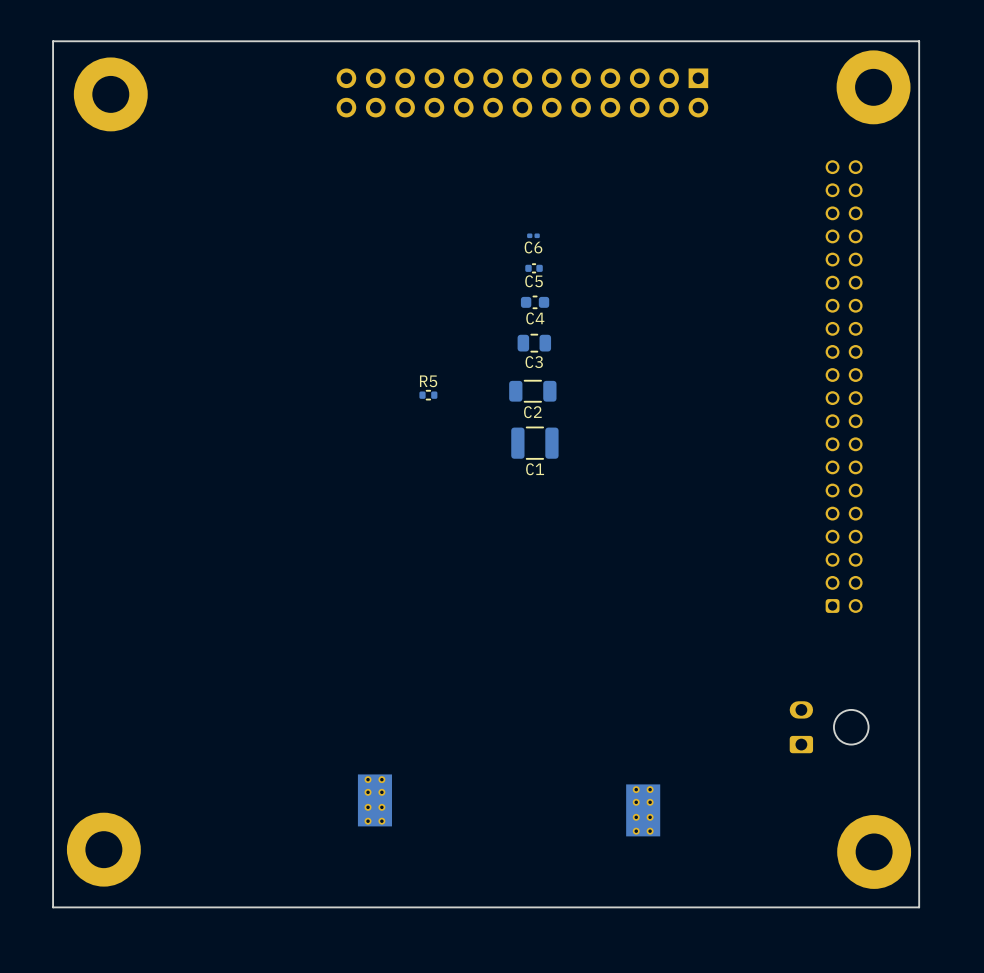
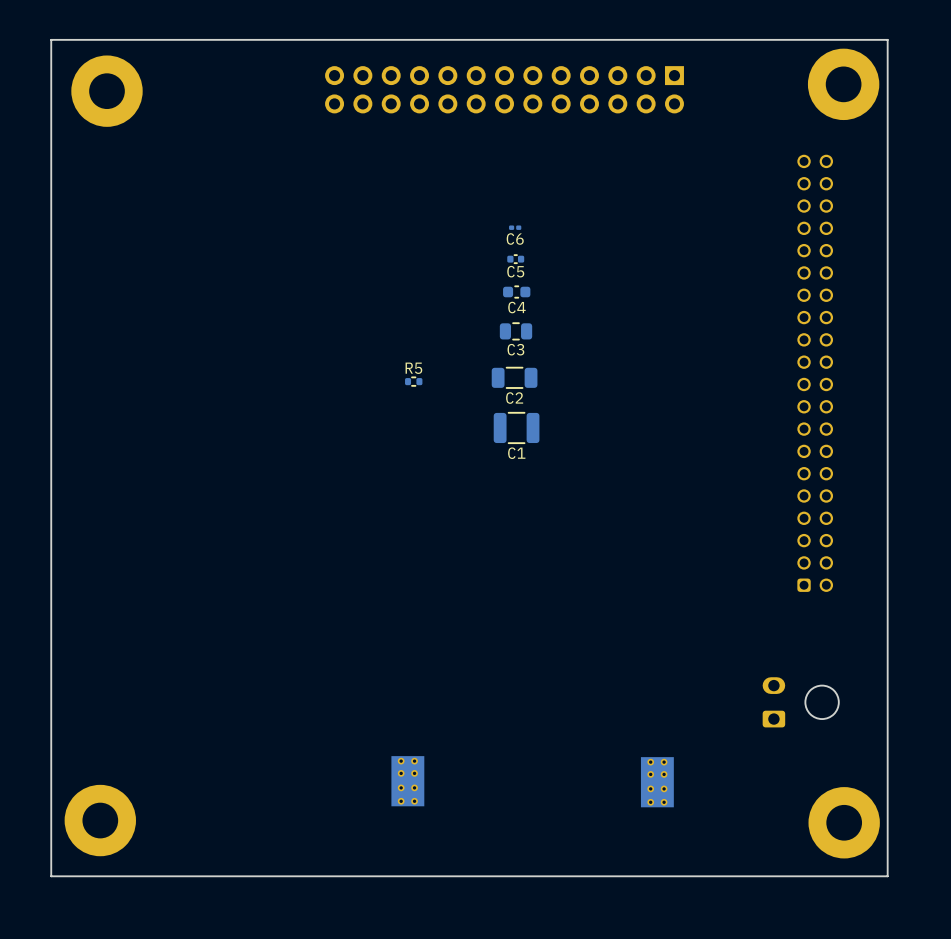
part position: (374, 800) -> (407, 781)
part position: (643, 810) -> (657, 782)

